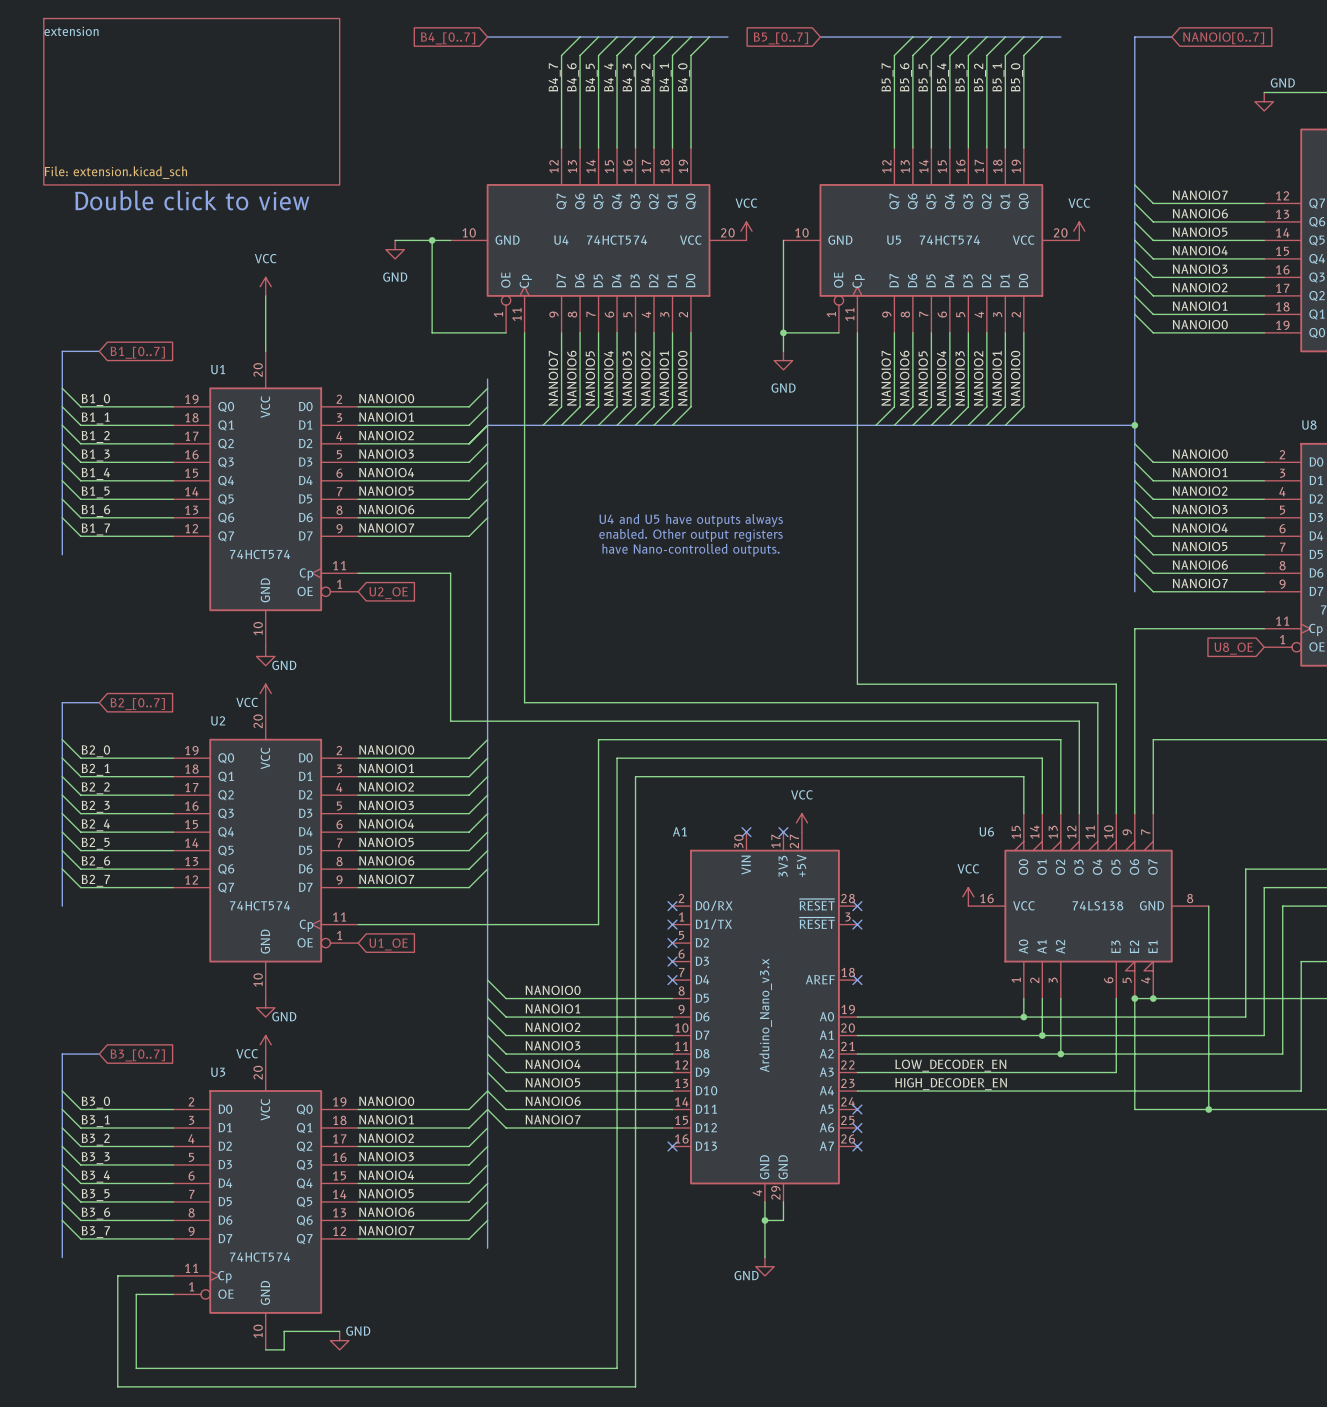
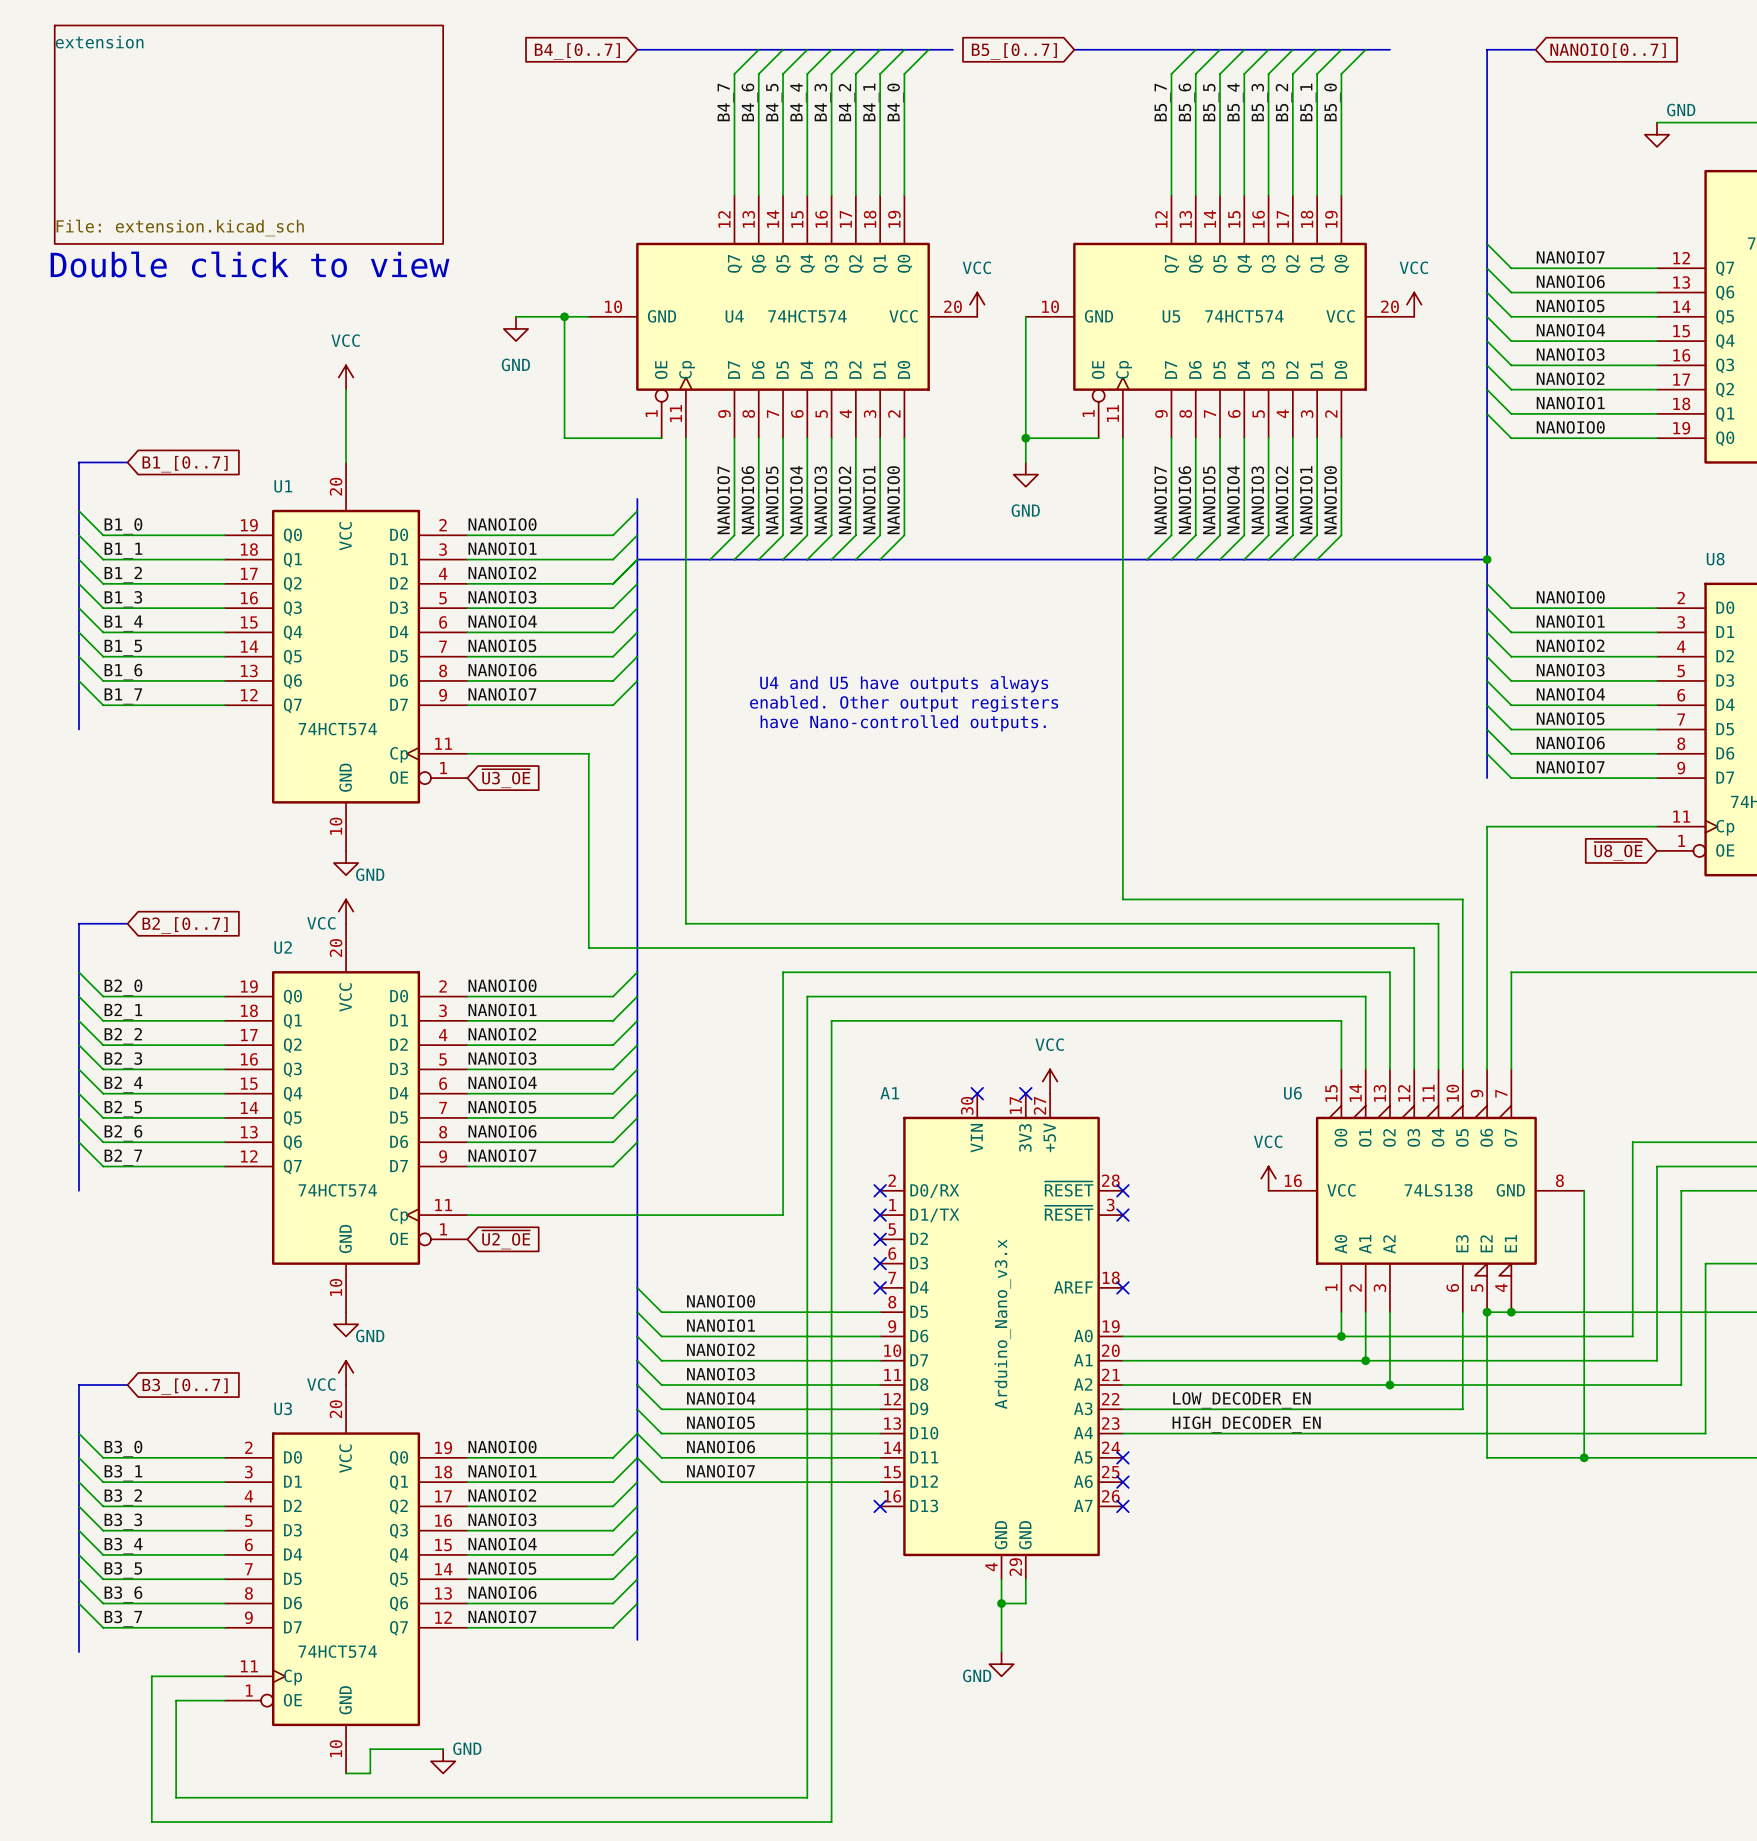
global label: U2_OE (388, 593) -> ~{U3_OE} (506, 778)
global label: U8_OE (1233, 648) -> ~{U8_OE} (1618, 851)
global label: U1_OE (388, 944) -> ~{U2_OE} (506, 1239)

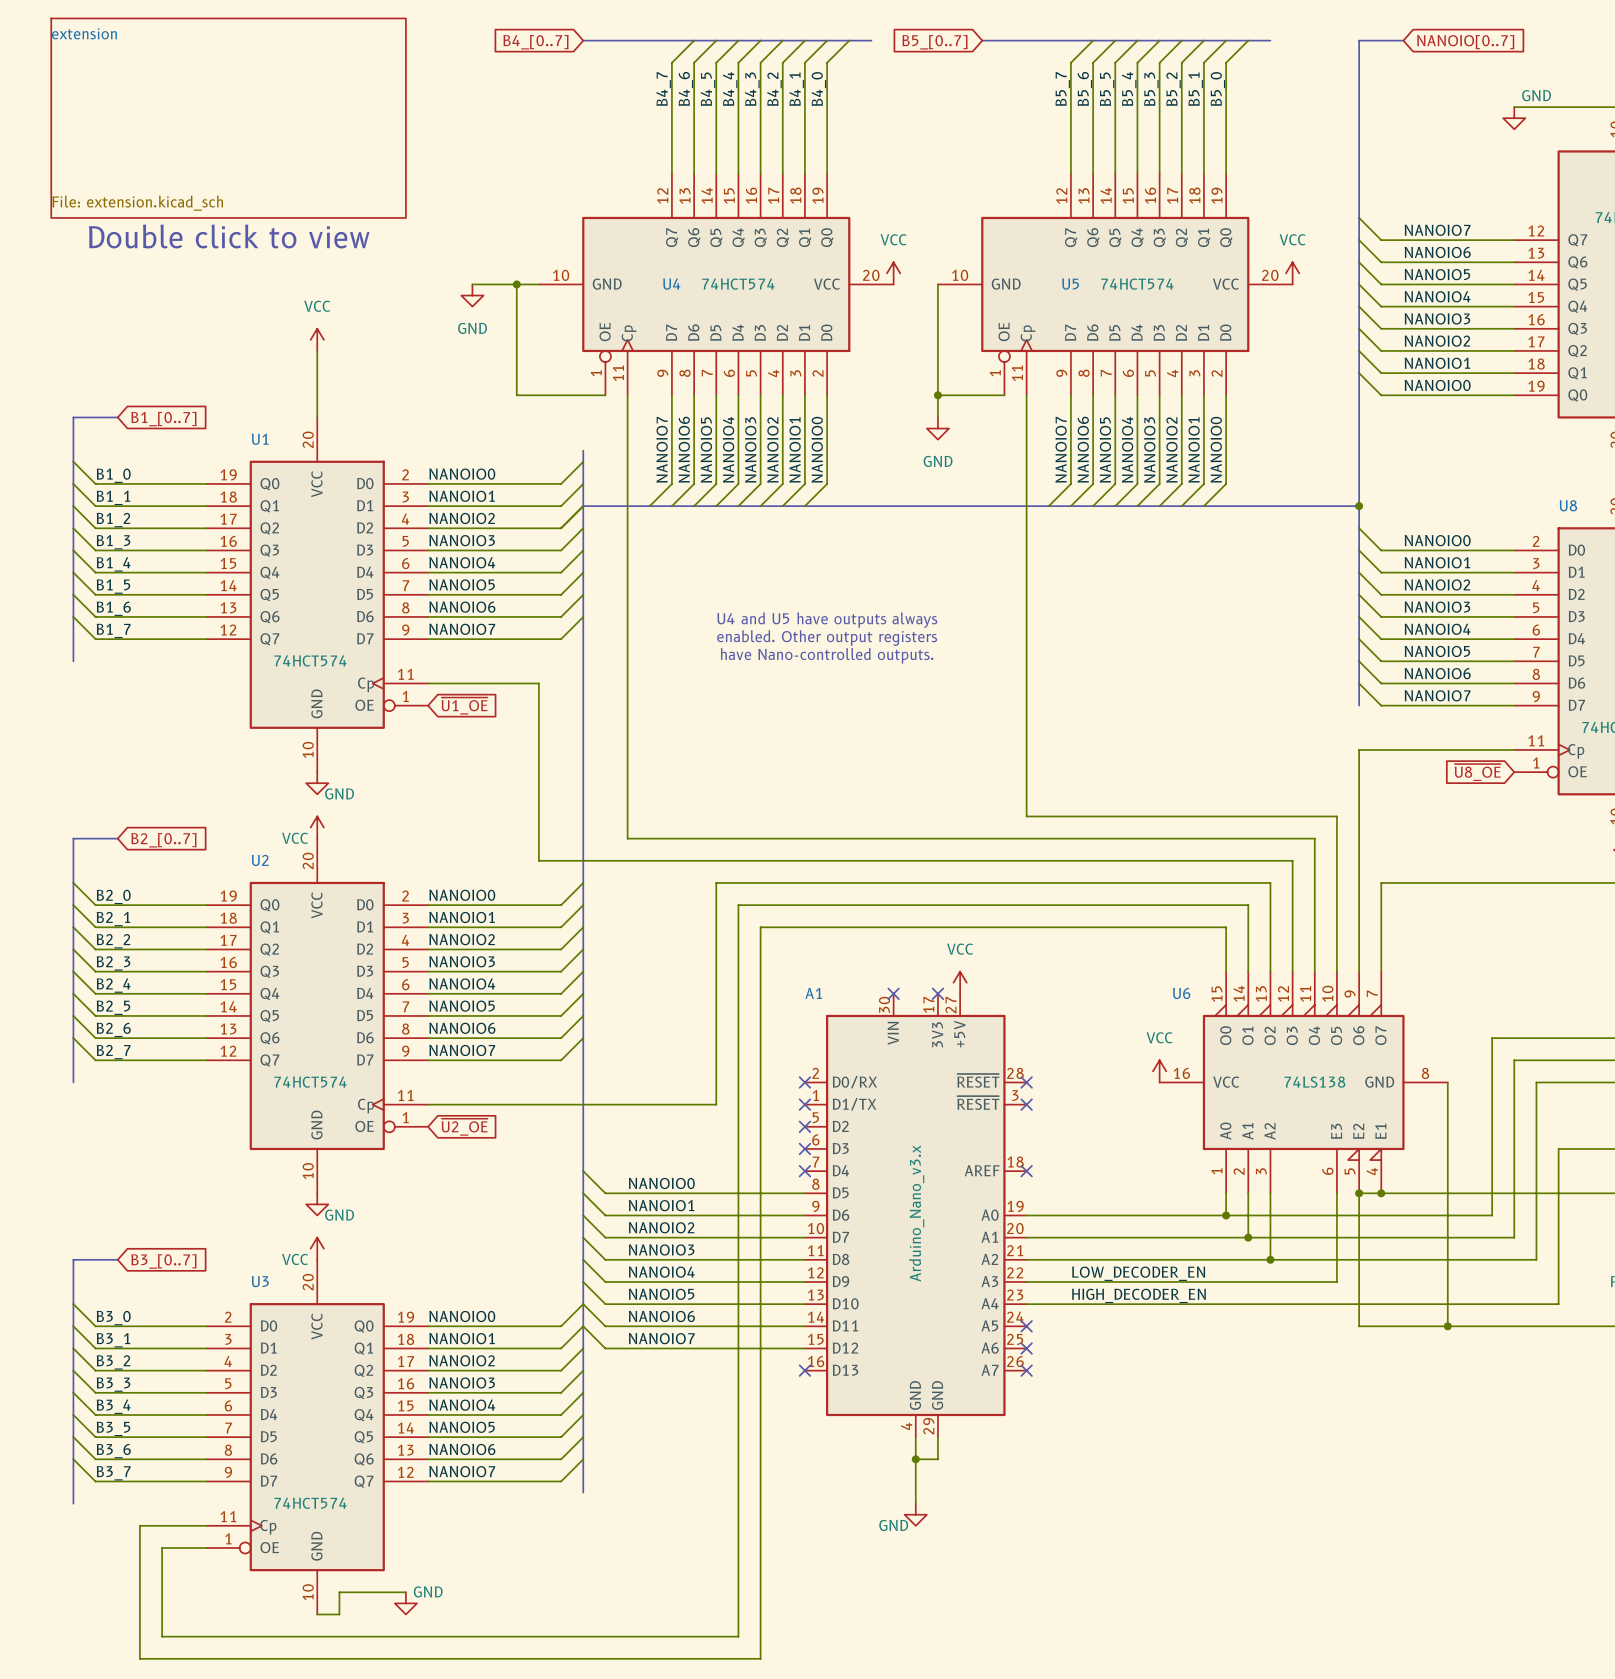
global label: ~{U3_OE} (506, 778) -> ~{U1_OE} (464, 706)

